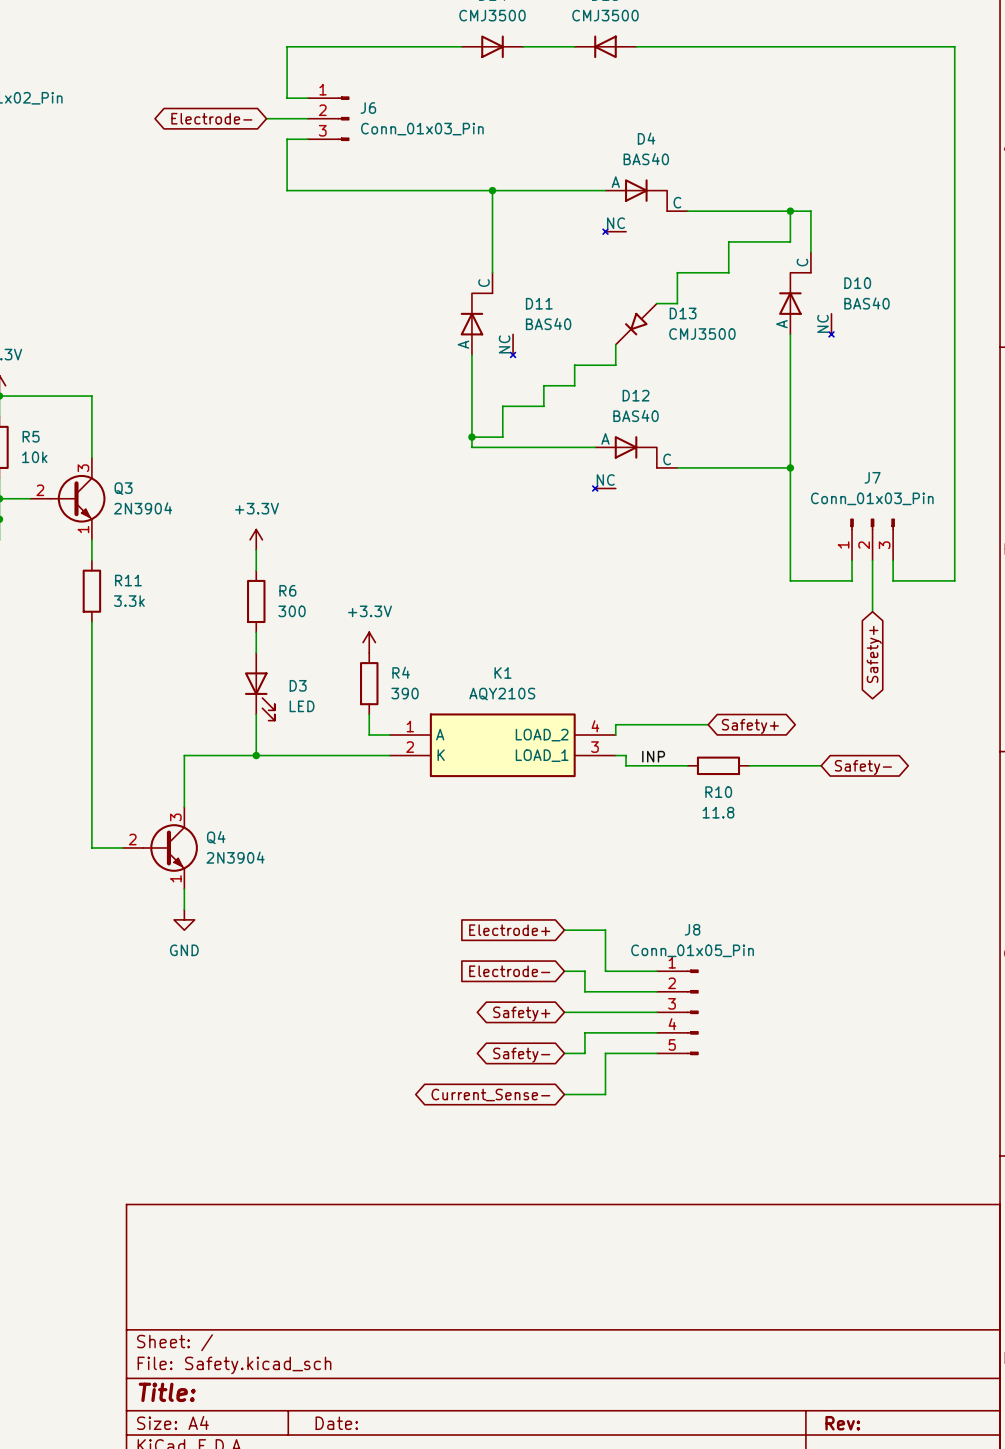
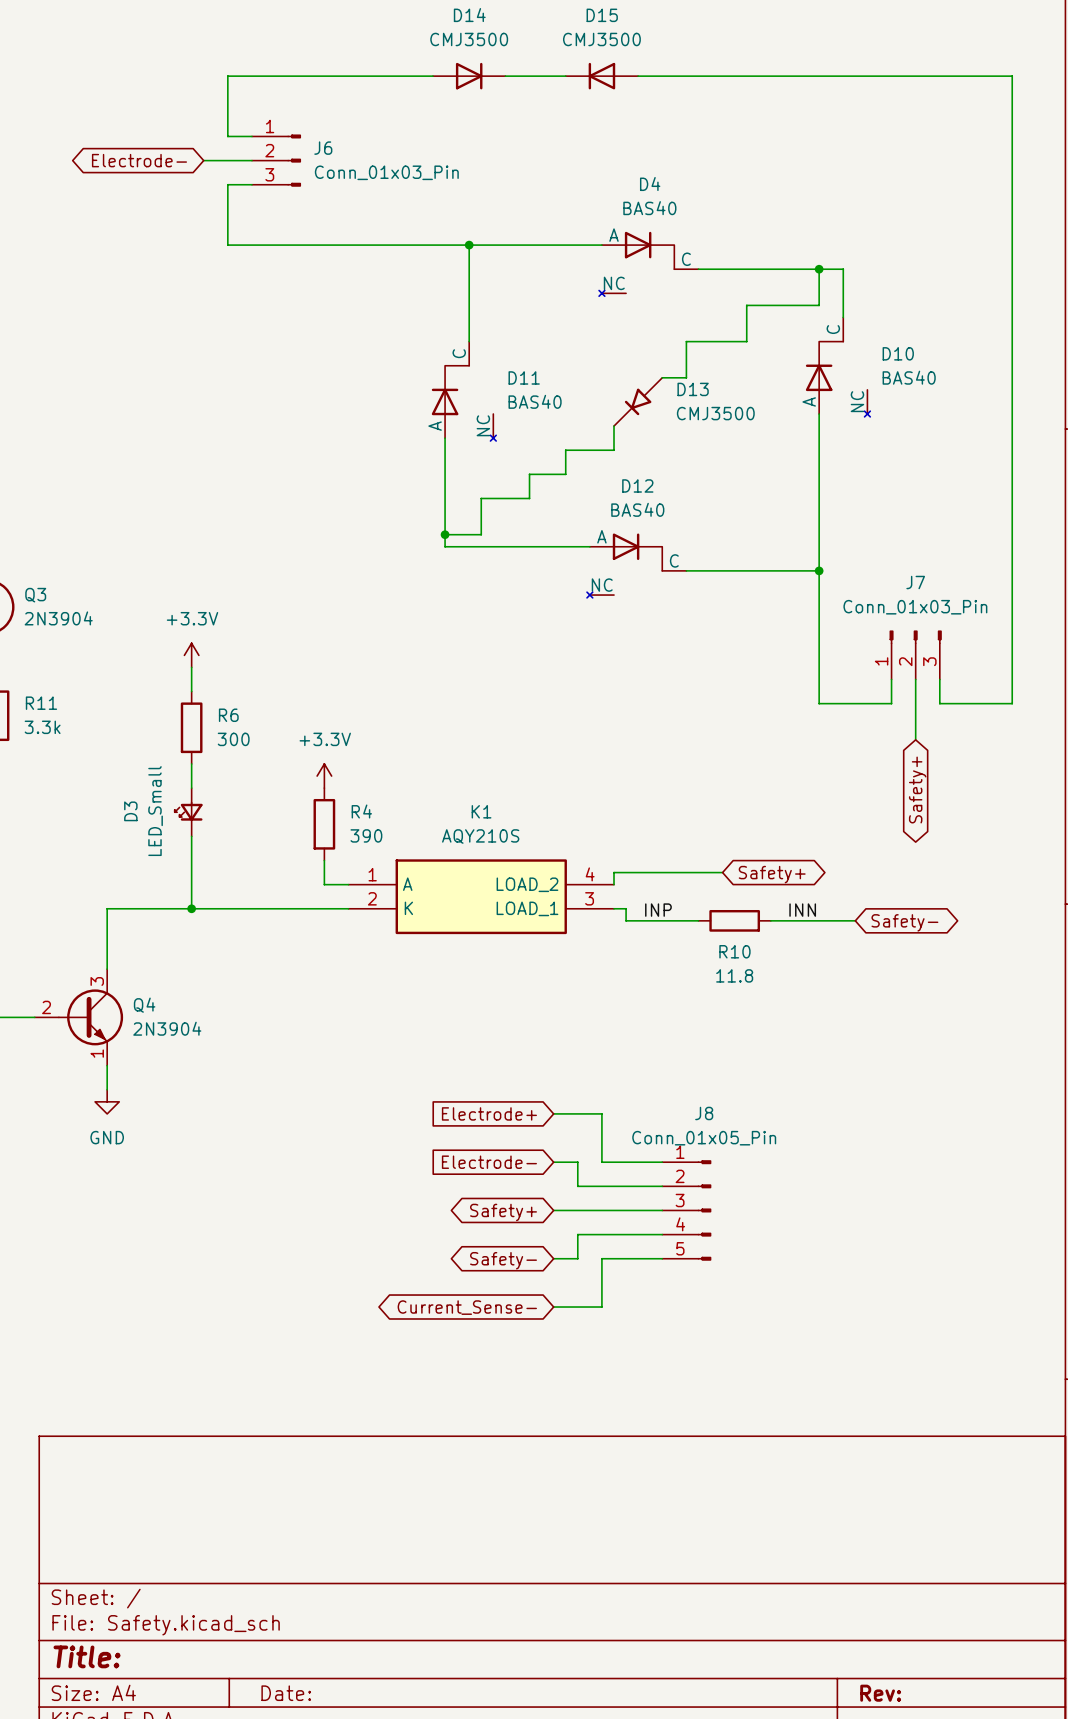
D3 symbol: [244, 652, 275, 721] -> [174, 788, 203, 837]
D3 name position: D3 (298, 685) -> D3 (130, 811)
D3 value: LED (302, 706) -> LED_Small (155, 811)
label: none -> INN (802, 910)

